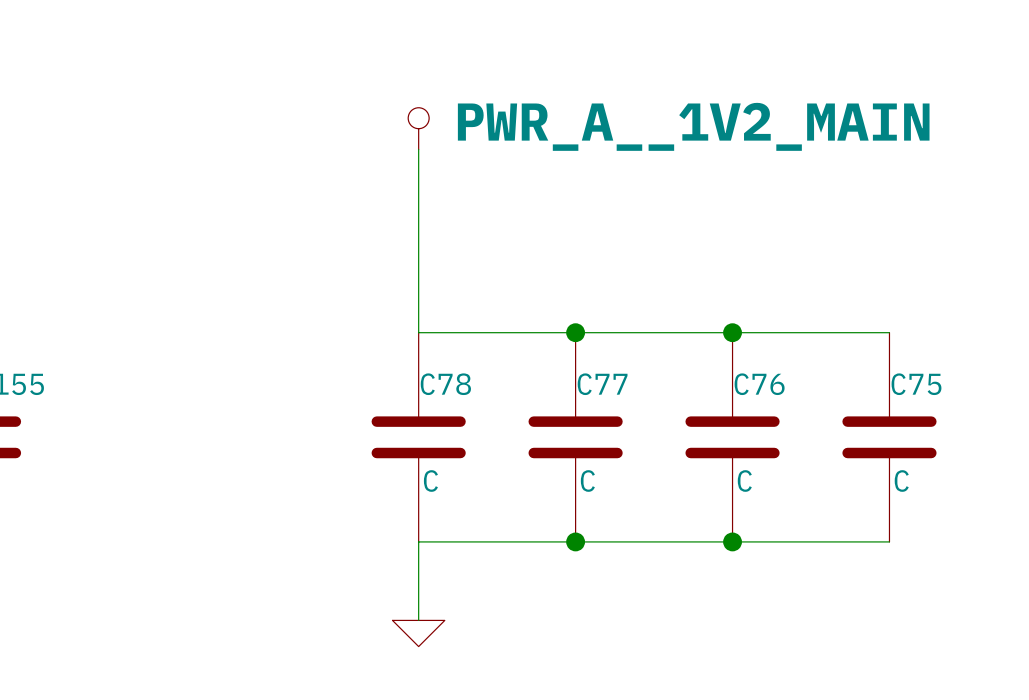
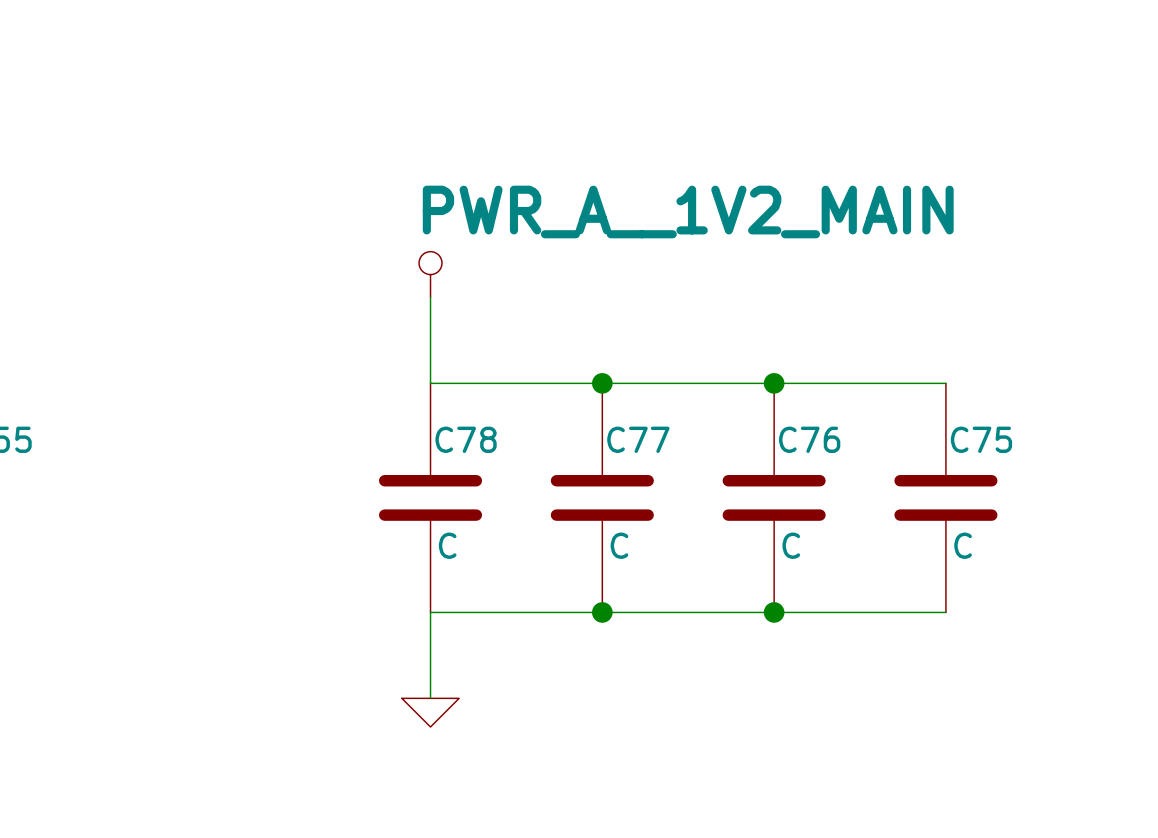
power symbol text position: PWR_A__1V2_MAIN (693, 126) -> PWR_A__1V2_MAIN (688, 211)
power symbol position: PWR_A__1V2_MAIN (418, 128) -> PWR_A__1V2_MAIN (430, 274)
wire: (418, 149) (418, 254) -> none

